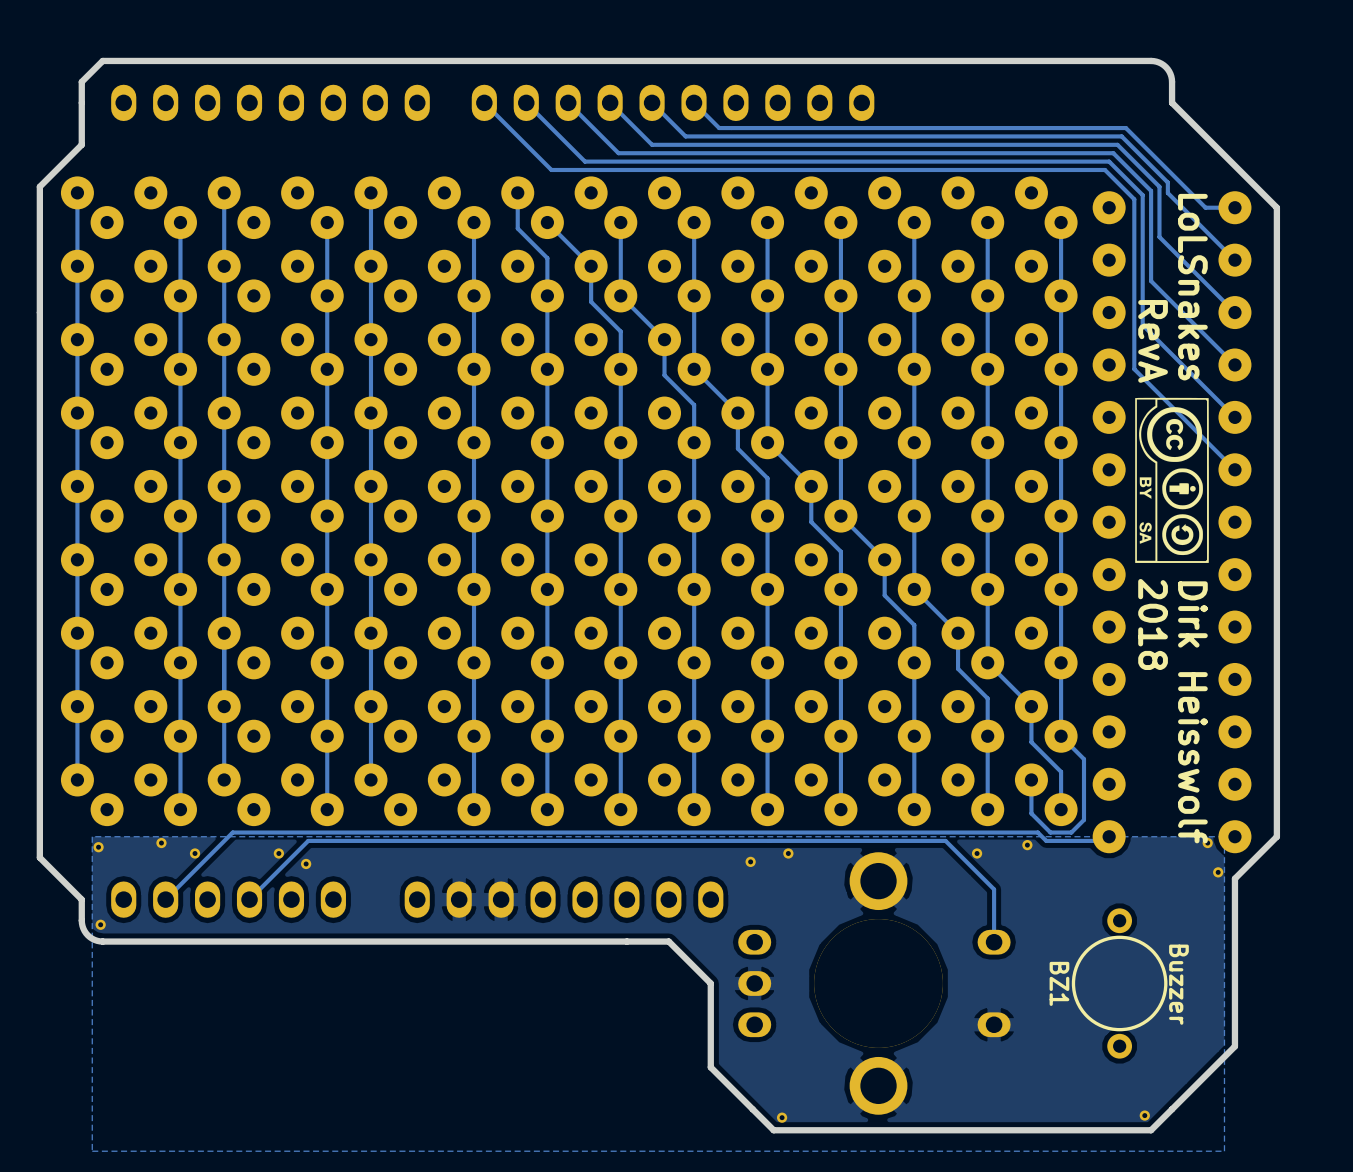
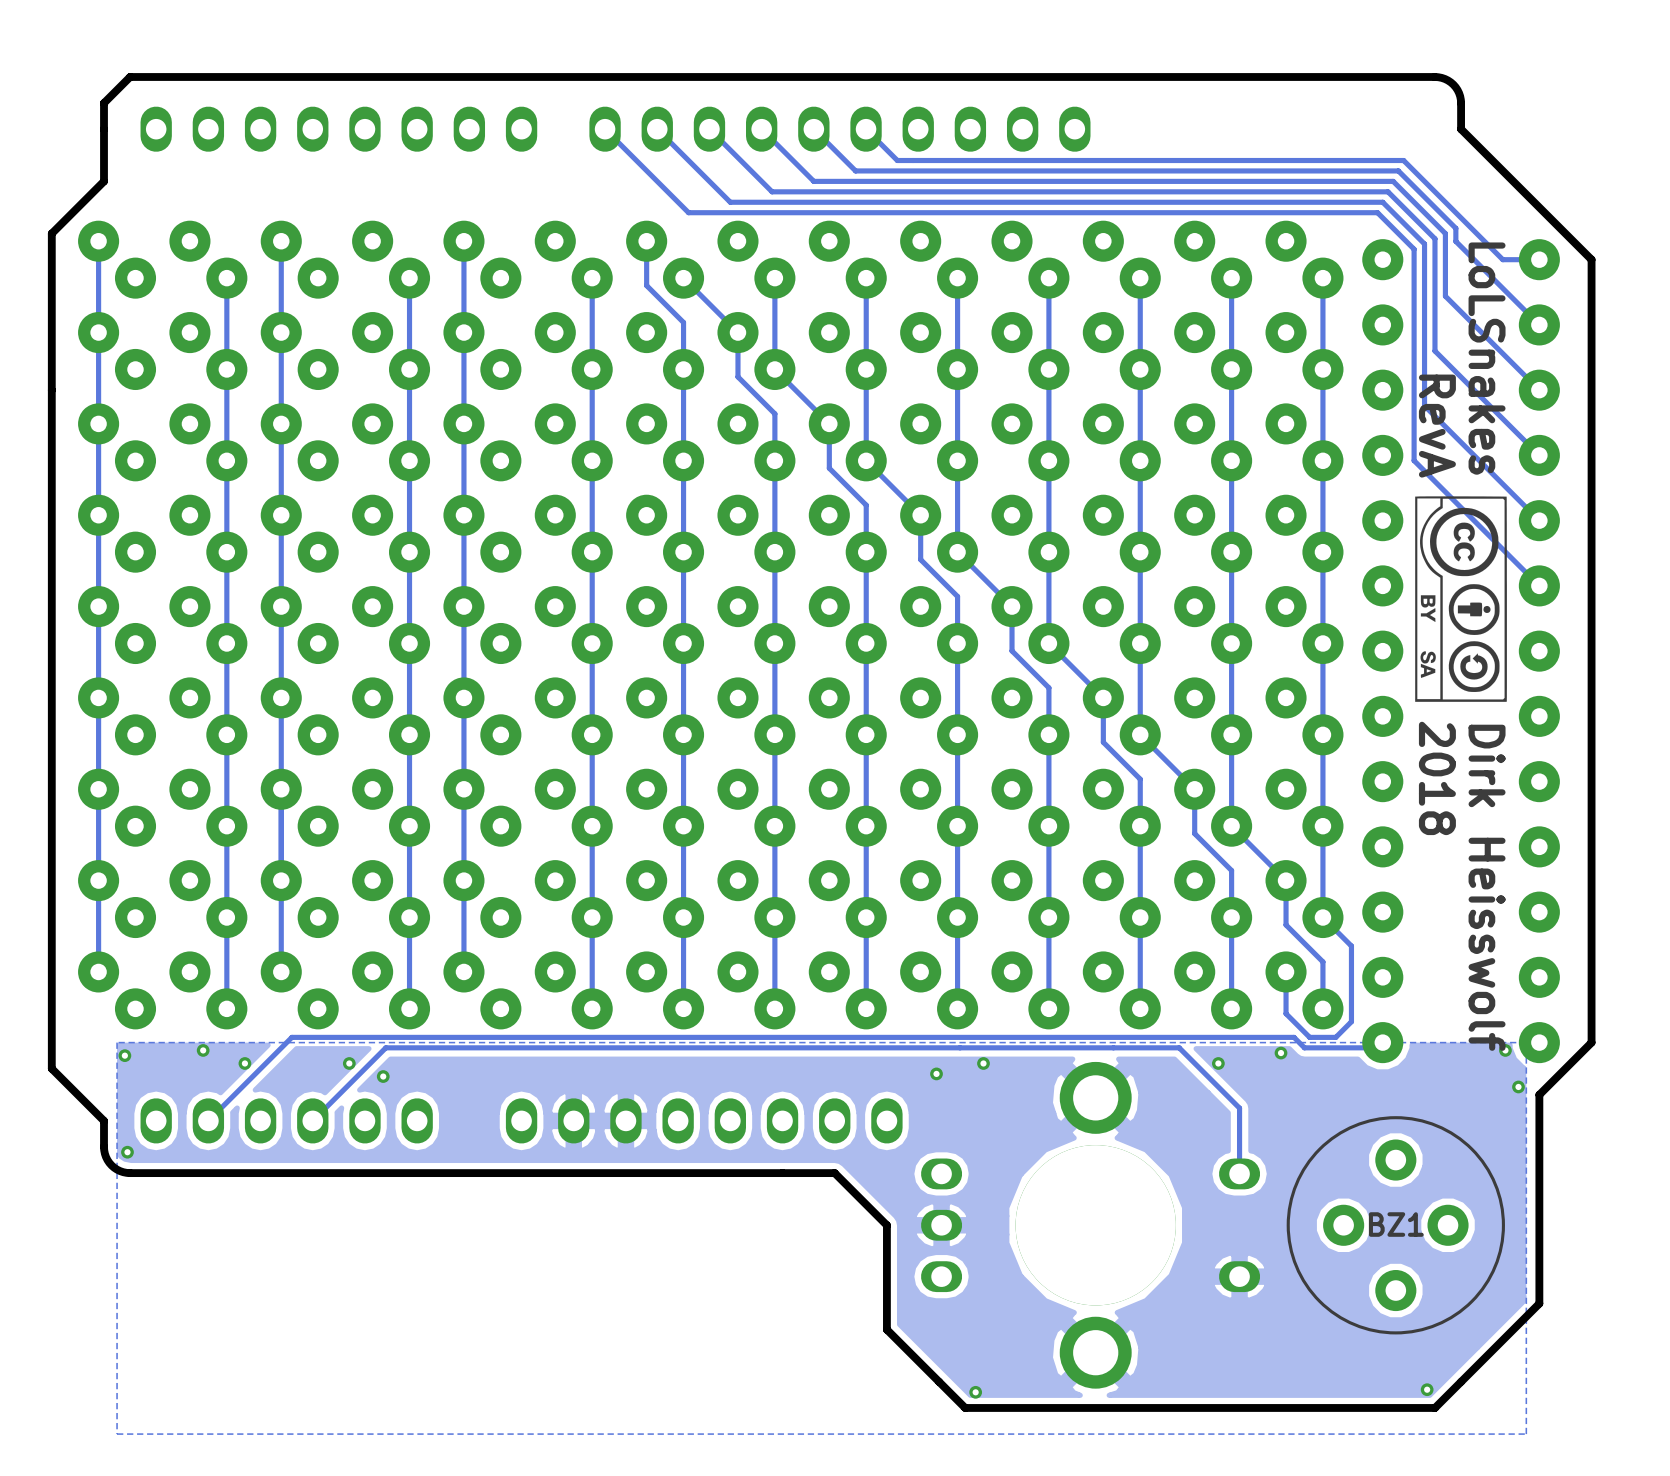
BZ1 footprint: [1071, 908, 1168, 1059] -> [1286, 1116, 1505, 1335]
BZ1 name position: BZ1 (1059, 983) -> BZ1 (1396, 1224)
BZ1 value: Buzzer (1178, 984) -> none

